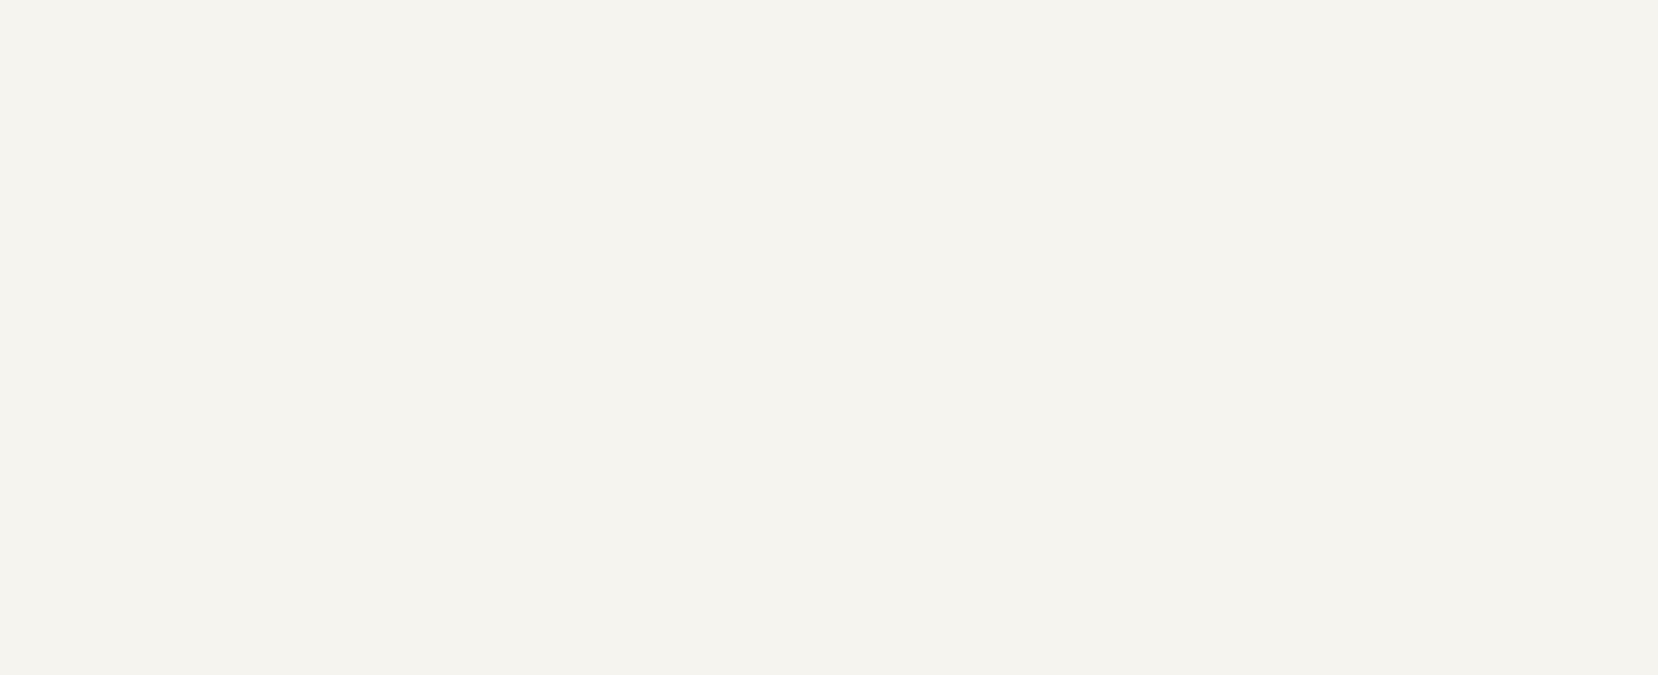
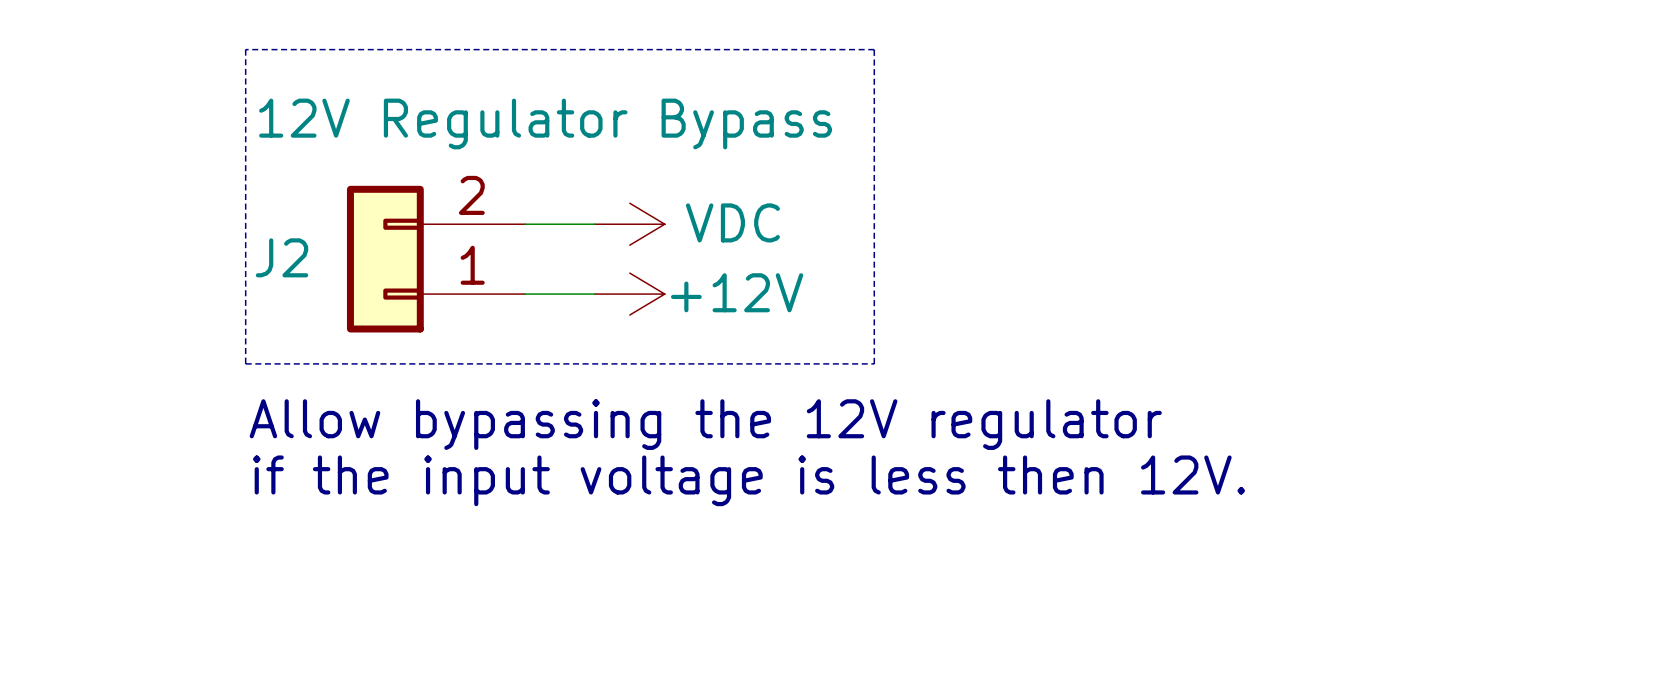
line: none -> (245, 49) (245, 363) (874, 363) (874, 49) (245, 49)
wire: none -> (525, 224) (594, 224)
power symbol: none -> VDC (629, 224)
J2: none -> 12V Regulator Bypass (436, 259)
wire: none -> (525, 294) (594, 294)
power symbol: none -> +12V (629, 294)
text: none -> Allow bypassing the 12V regulator (705, 424)
text: none -> if the input voltage is less then 12V. (748, 480)

